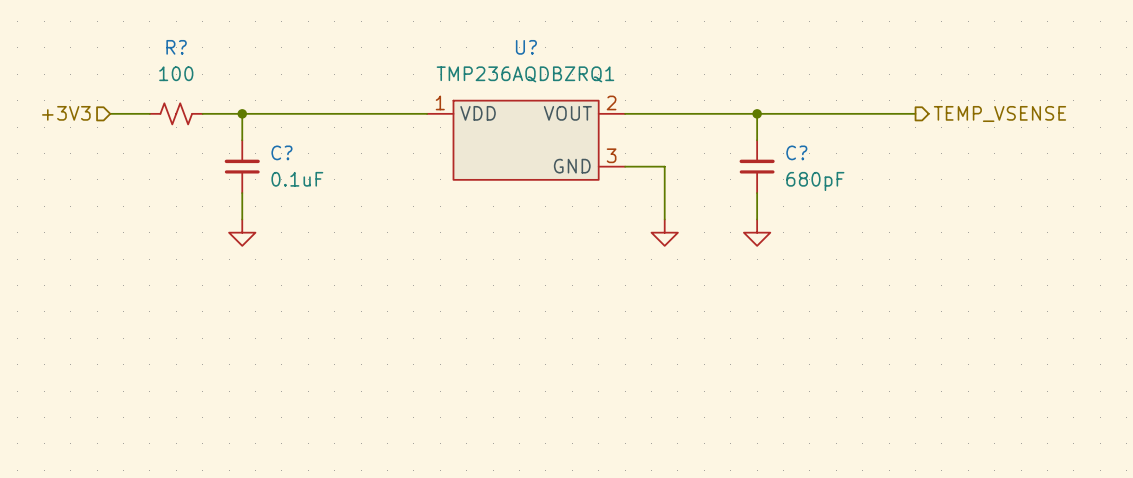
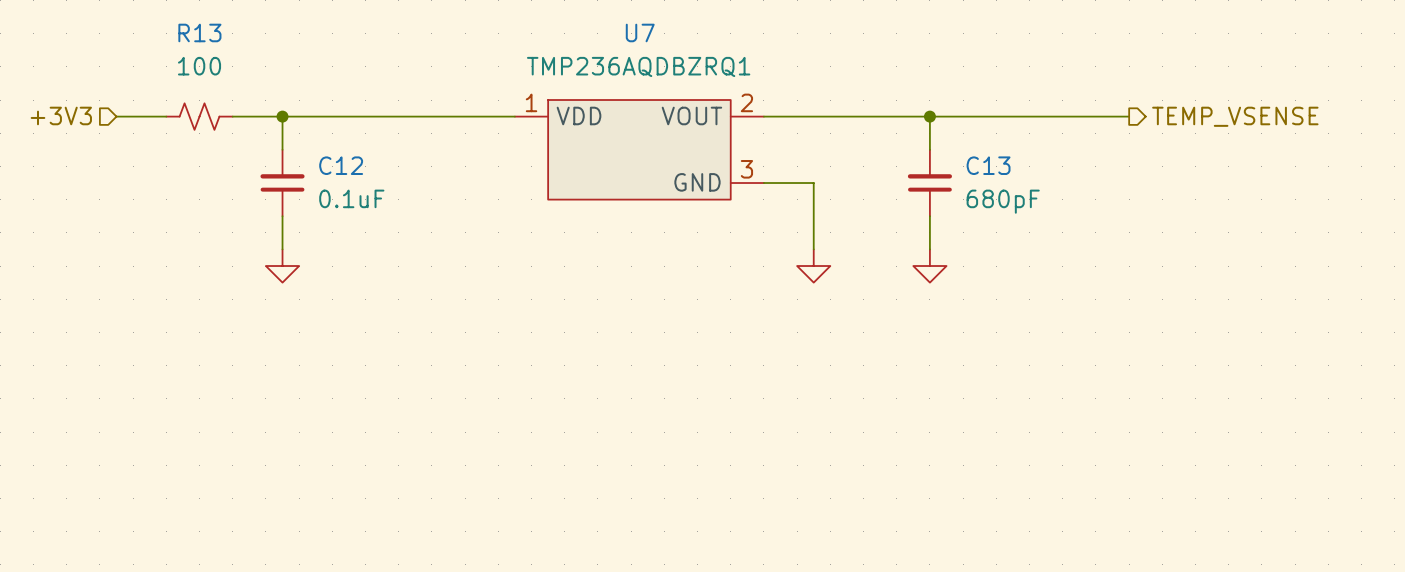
R? name: R? (176, 47) -> R13 (199, 32)
U? name: U? (526, 47) -> U7 (640, 32)
C? name: C? (281, 152) -> C12 (341, 165)
C? name: C? (796, 152) -> C13 (988, 165)

